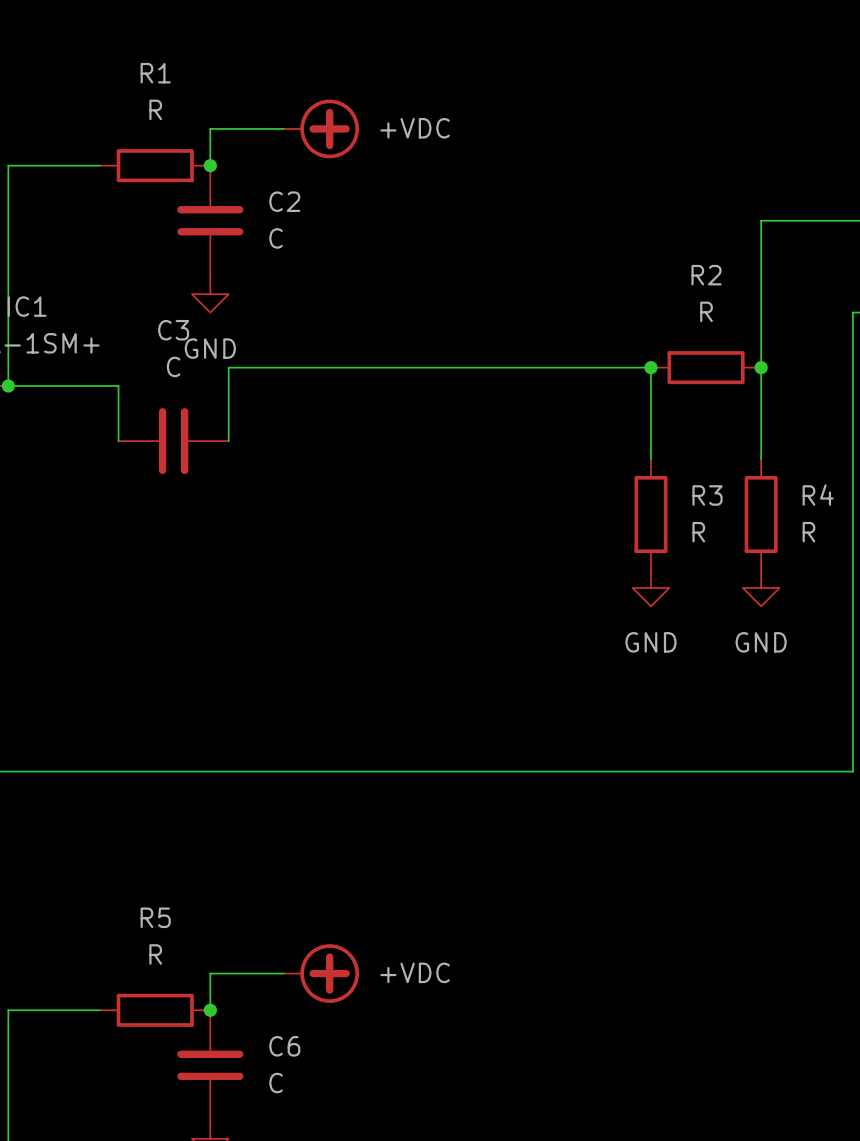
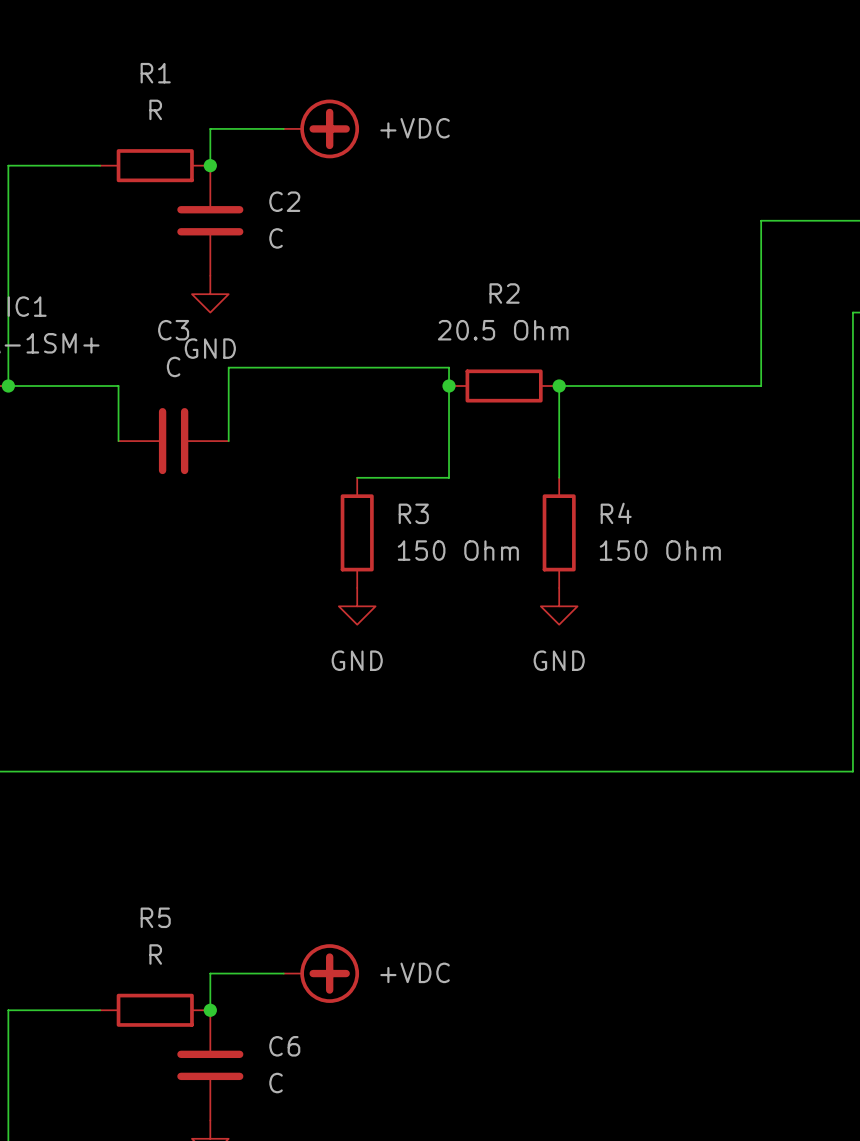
R2 value: R (706, 311) -> 20.5 Ohm (503, 330)
wire: (449, 367) (650, 367) (650, 459) -> (449, 367) (449, 477) (357, 477)
junction: (650, 367) -> none
R2 position: (706, 367) -> (504, 386)
junction: (761, 367) -> none
junction: none -> (449, 386)
junction: none -> (559, 386)
wire: (761, 386) (761, 459) -> (761, 386) (559, 386) (559, 477)
R3 position: (650, 514) -> (357, 532)
R4 position: (761, 514) -> (559, 532)
R3 value: R (698, 532) -> 150 Ohm (458, 550)
R4 value: R (808, 532) -> 150 Ohm (660, 550)
power symbol position: GND (650, 587) -> GND (559, 606)
power symbol: GND (761, 587) -> none
power symbol: none -> GND (357, 606)

